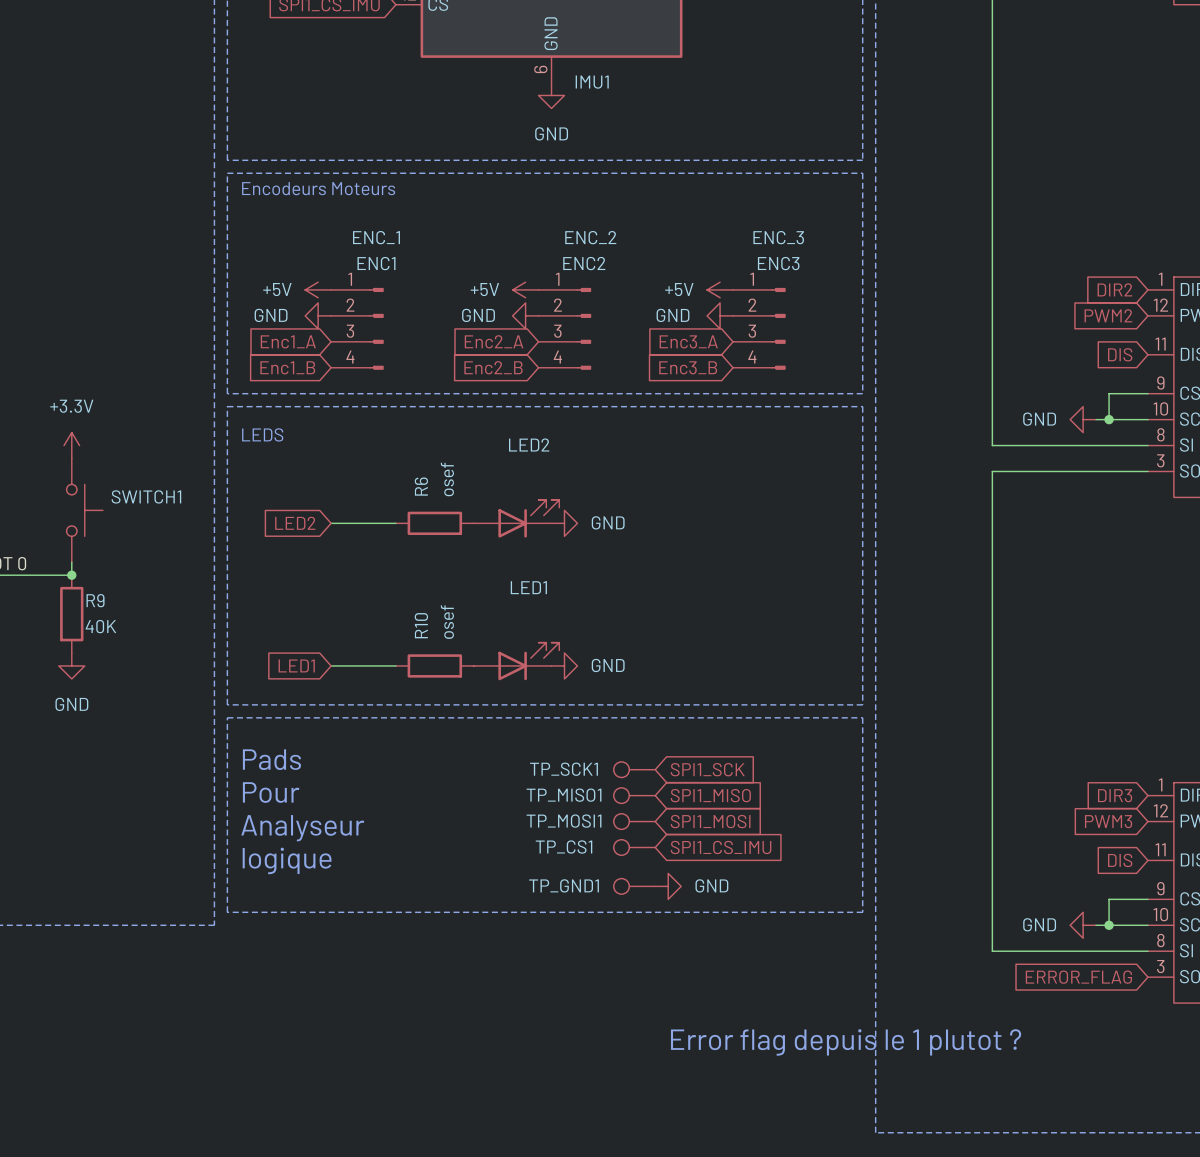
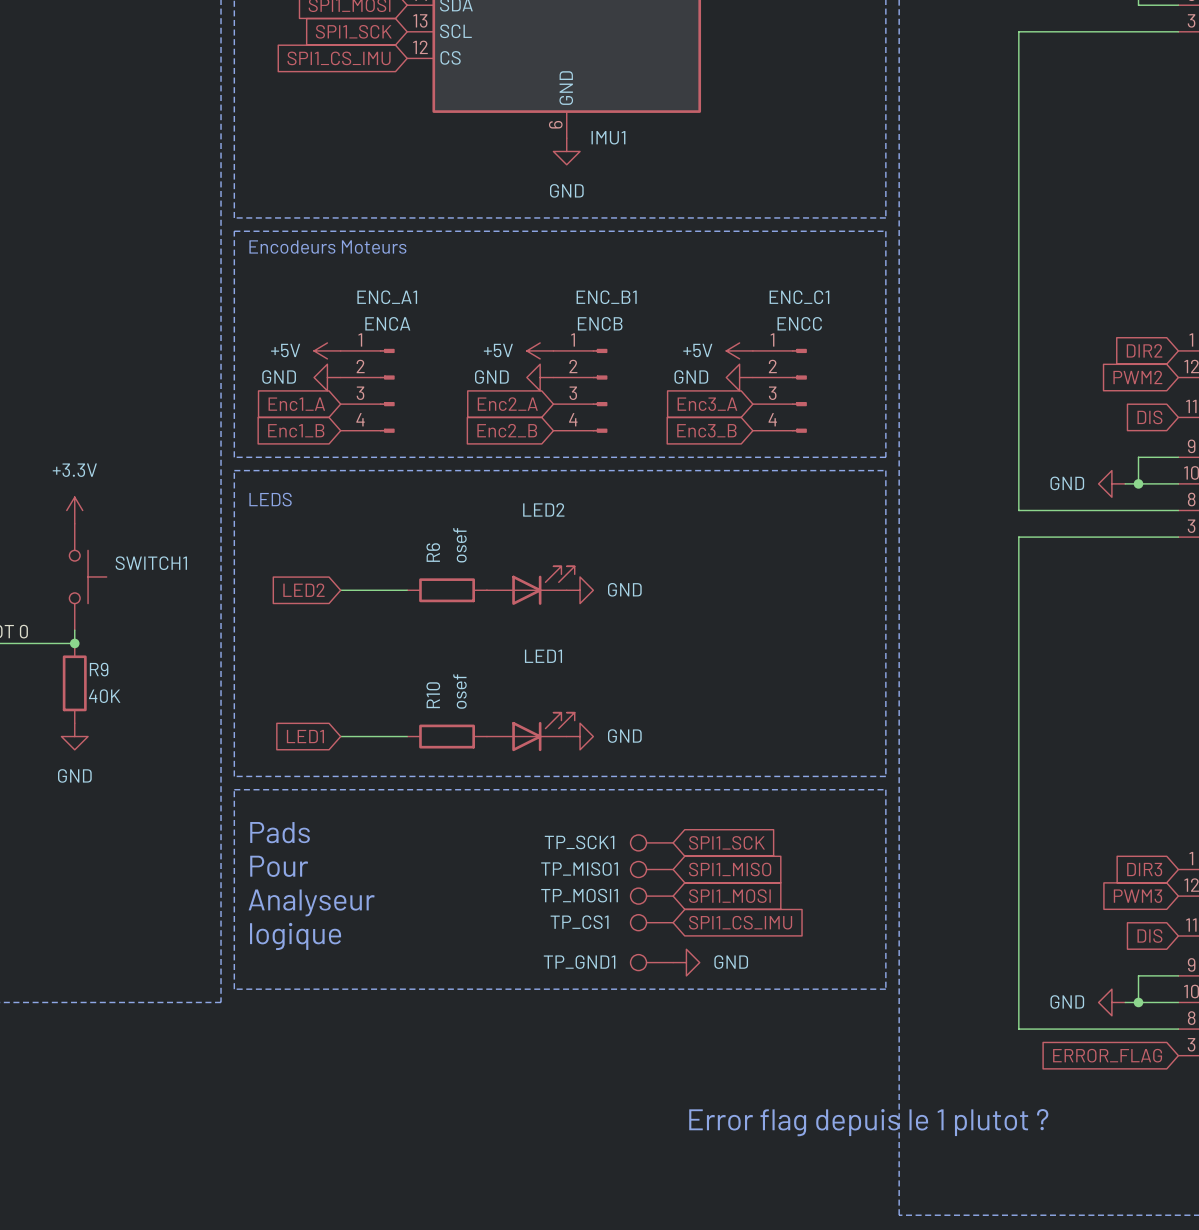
ENC_1 name: ENC_1 (376, 237) -> ENC_A1 (387, 297)
ENC_2 name: ENC_2 (590, 237) -> ENC_B1 (606, 297)
ENC_3 name: ENC_3 (778, 237) -> ENC_C1 (799, 297)
ENC_1 value: ENC1 (376, 263) -> ENCA (387, 323)
ENC_2 value: ENC2 (584, 263) -> ENCB (600, 323)
ENC_3 value: ENC3 (778, 263) -> ENCC (799, 323)

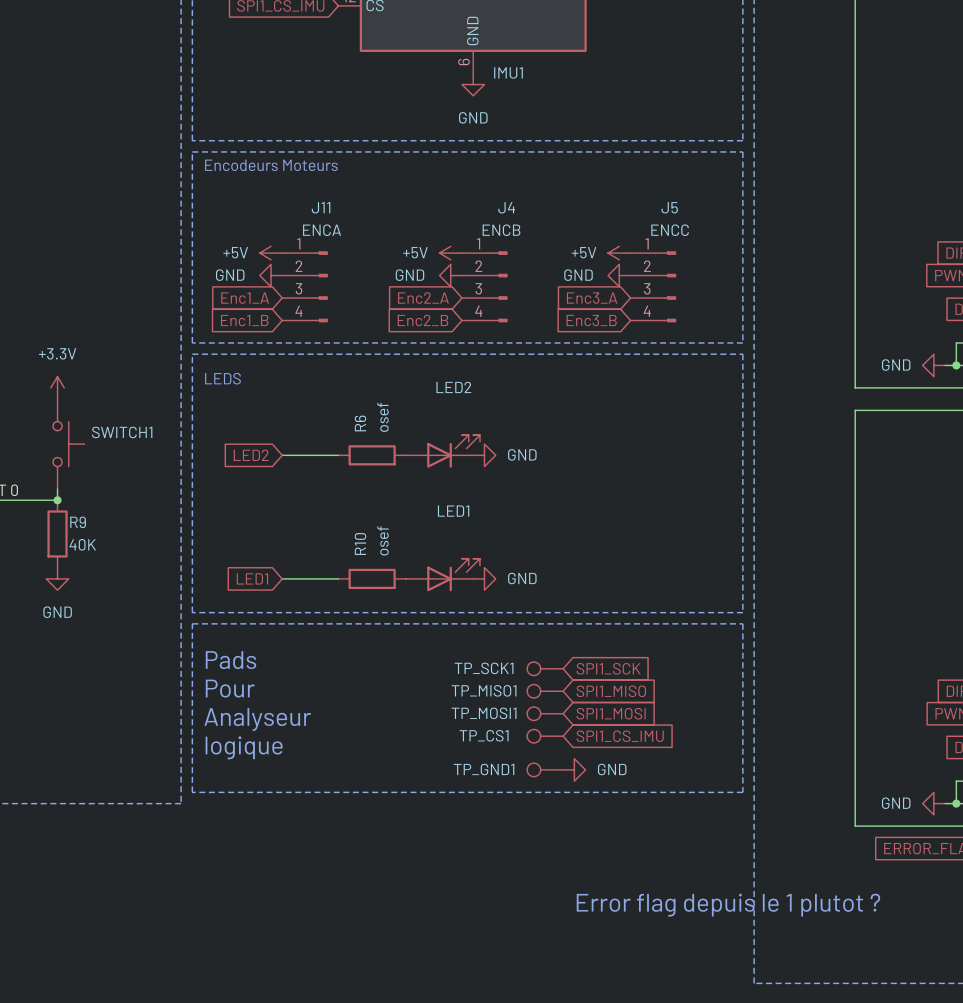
ENC_A1 name: ENC_A1 (387, 297) -> J11 (321, 207)
ENC_B1 name: ENC_B1 (606, 297) -> J4 (506, 207)
ENC_C1 name: ENC_C1 (799, 297) -> J5 (669, 207)

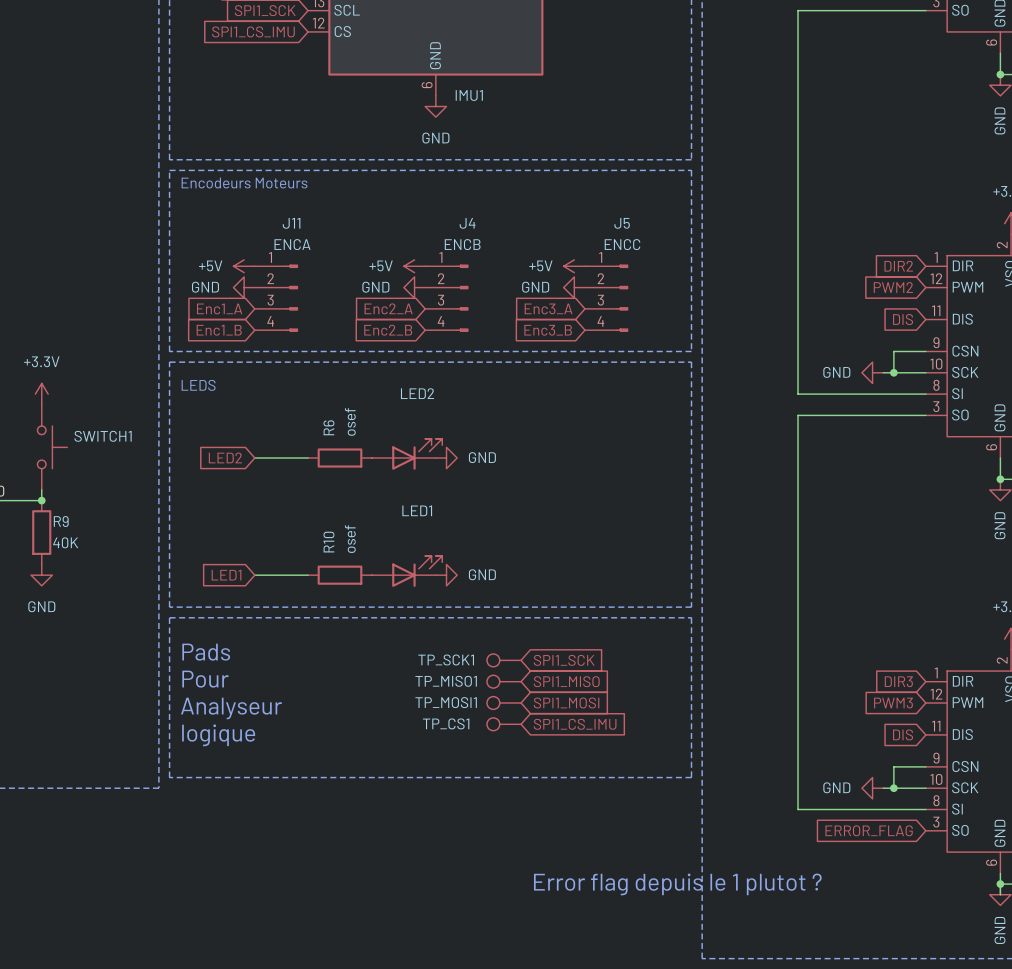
TP_GND1: (545, 769) -> none
power symbol: GND (574, 769) -> none

